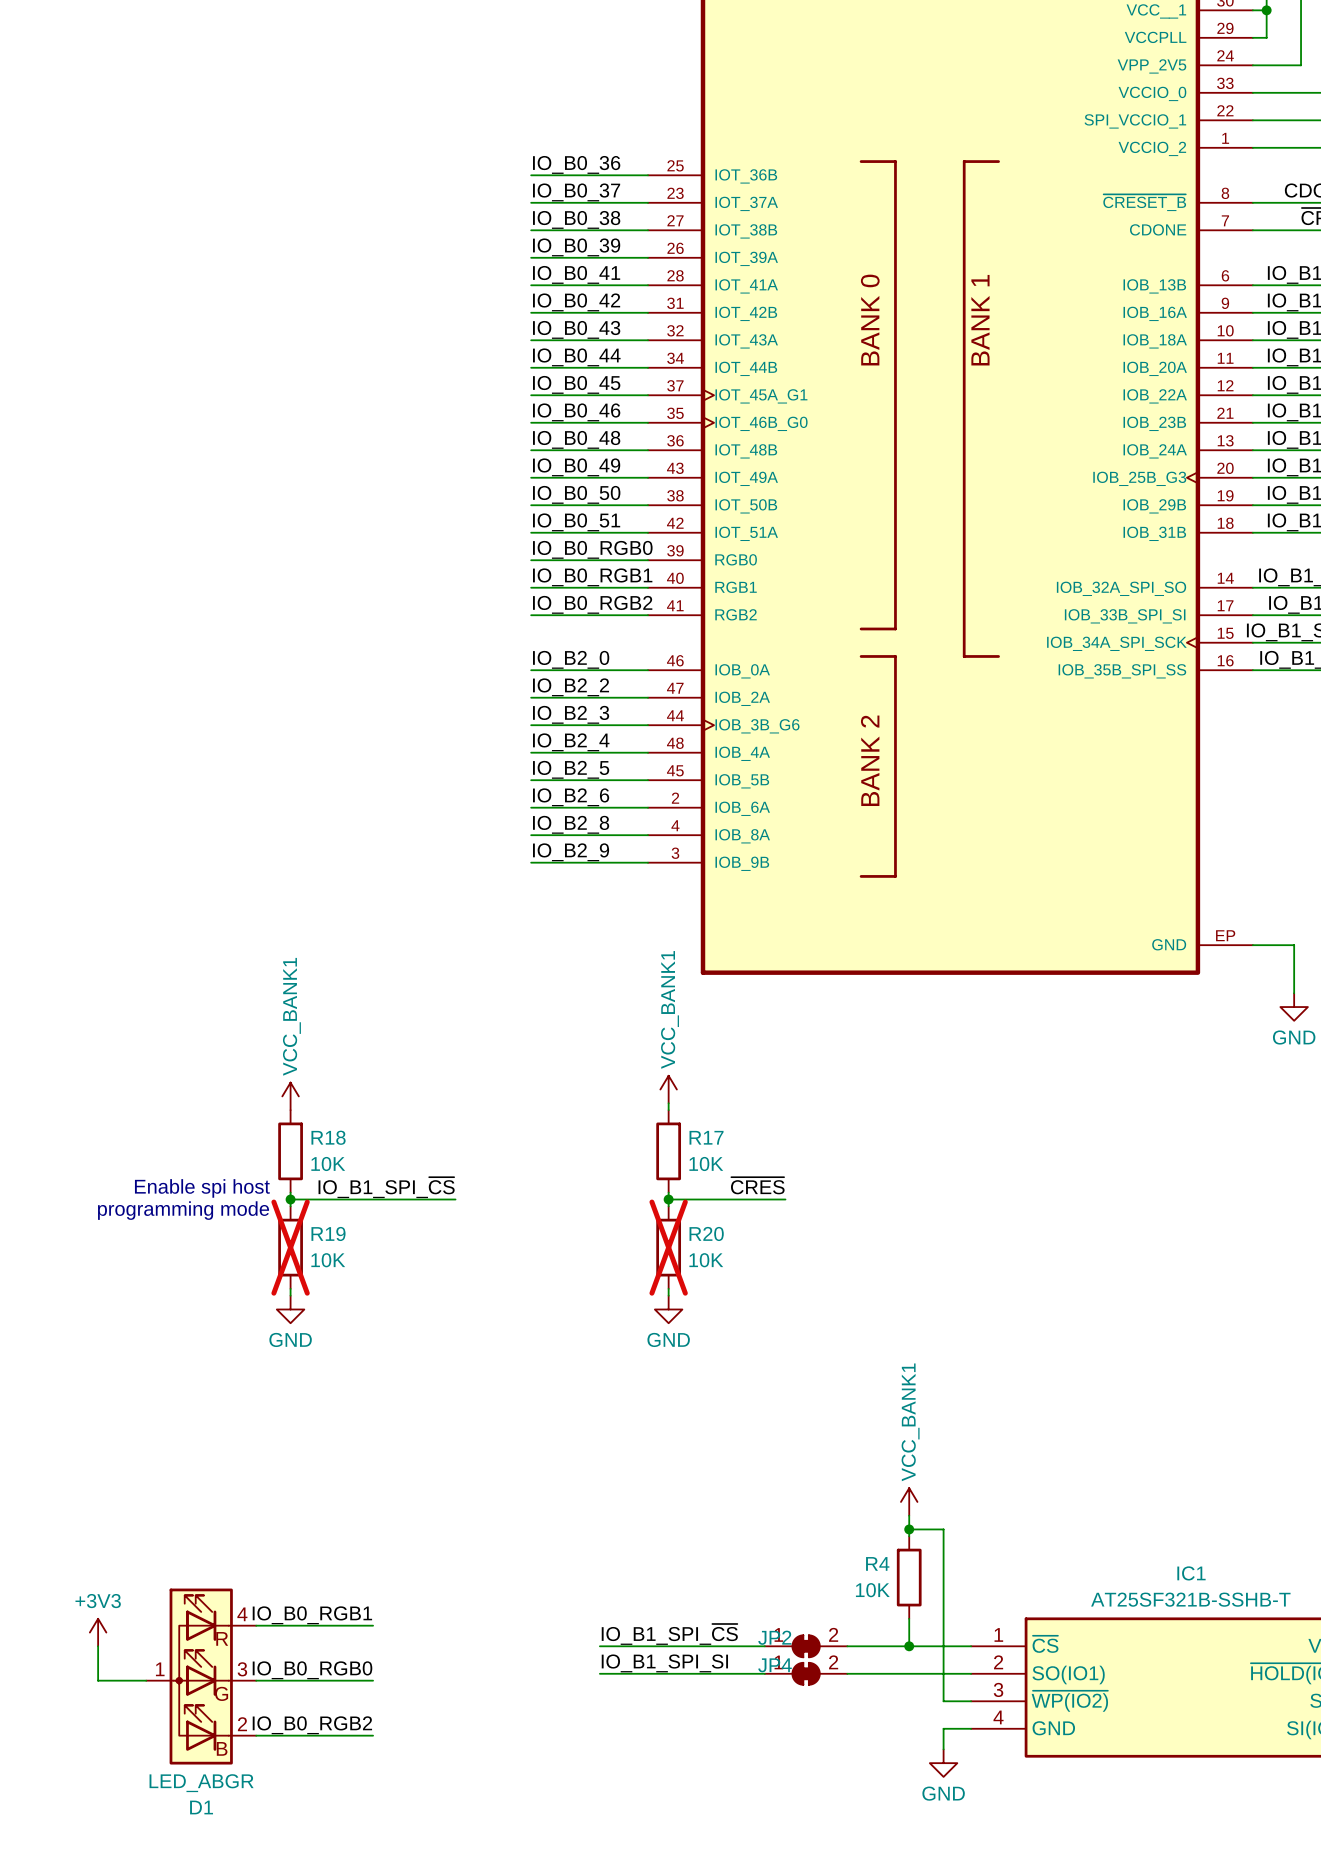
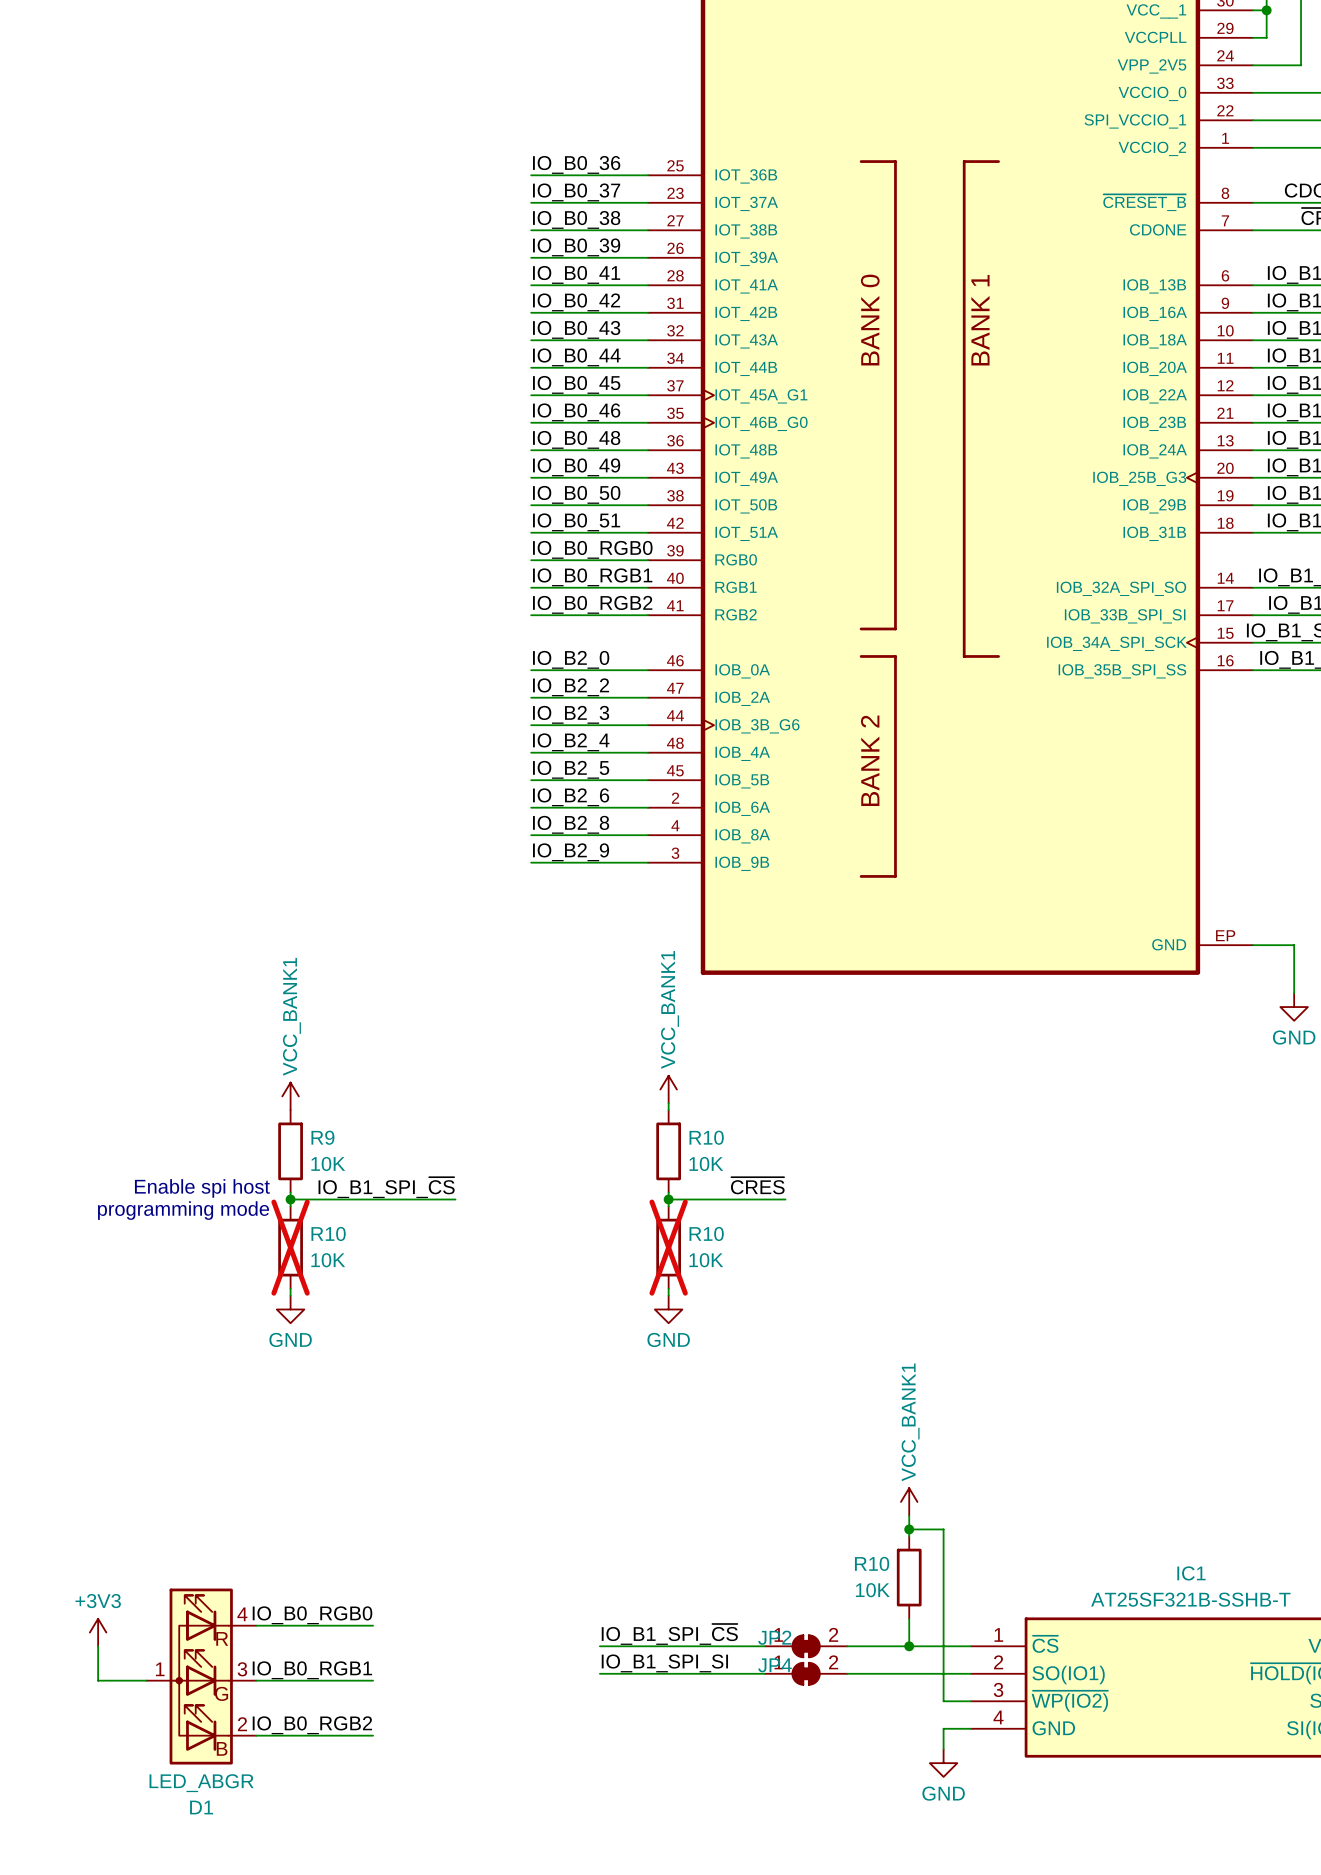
R18 name: R18 (328, 1137) -> R9 (322, 1137)
R17 name: R17 (706, 1137) -> R10 (706, 1137)
R19 name: R19 (328, 1233) -> R10 (328, 1233)
R20 name: R20 (706, 1233) -> R10 (706, 1233)
R4 name: R4 (877, 1563) -> R10 (872, 1563)
label: IO_B0_RGB1 (312, 1615) -> IO_B0_RGB0 (312, 1615)
label: IO_B0_RGB0 (312, 1670) -> IO_B0_RGB1 (312, 1670)

